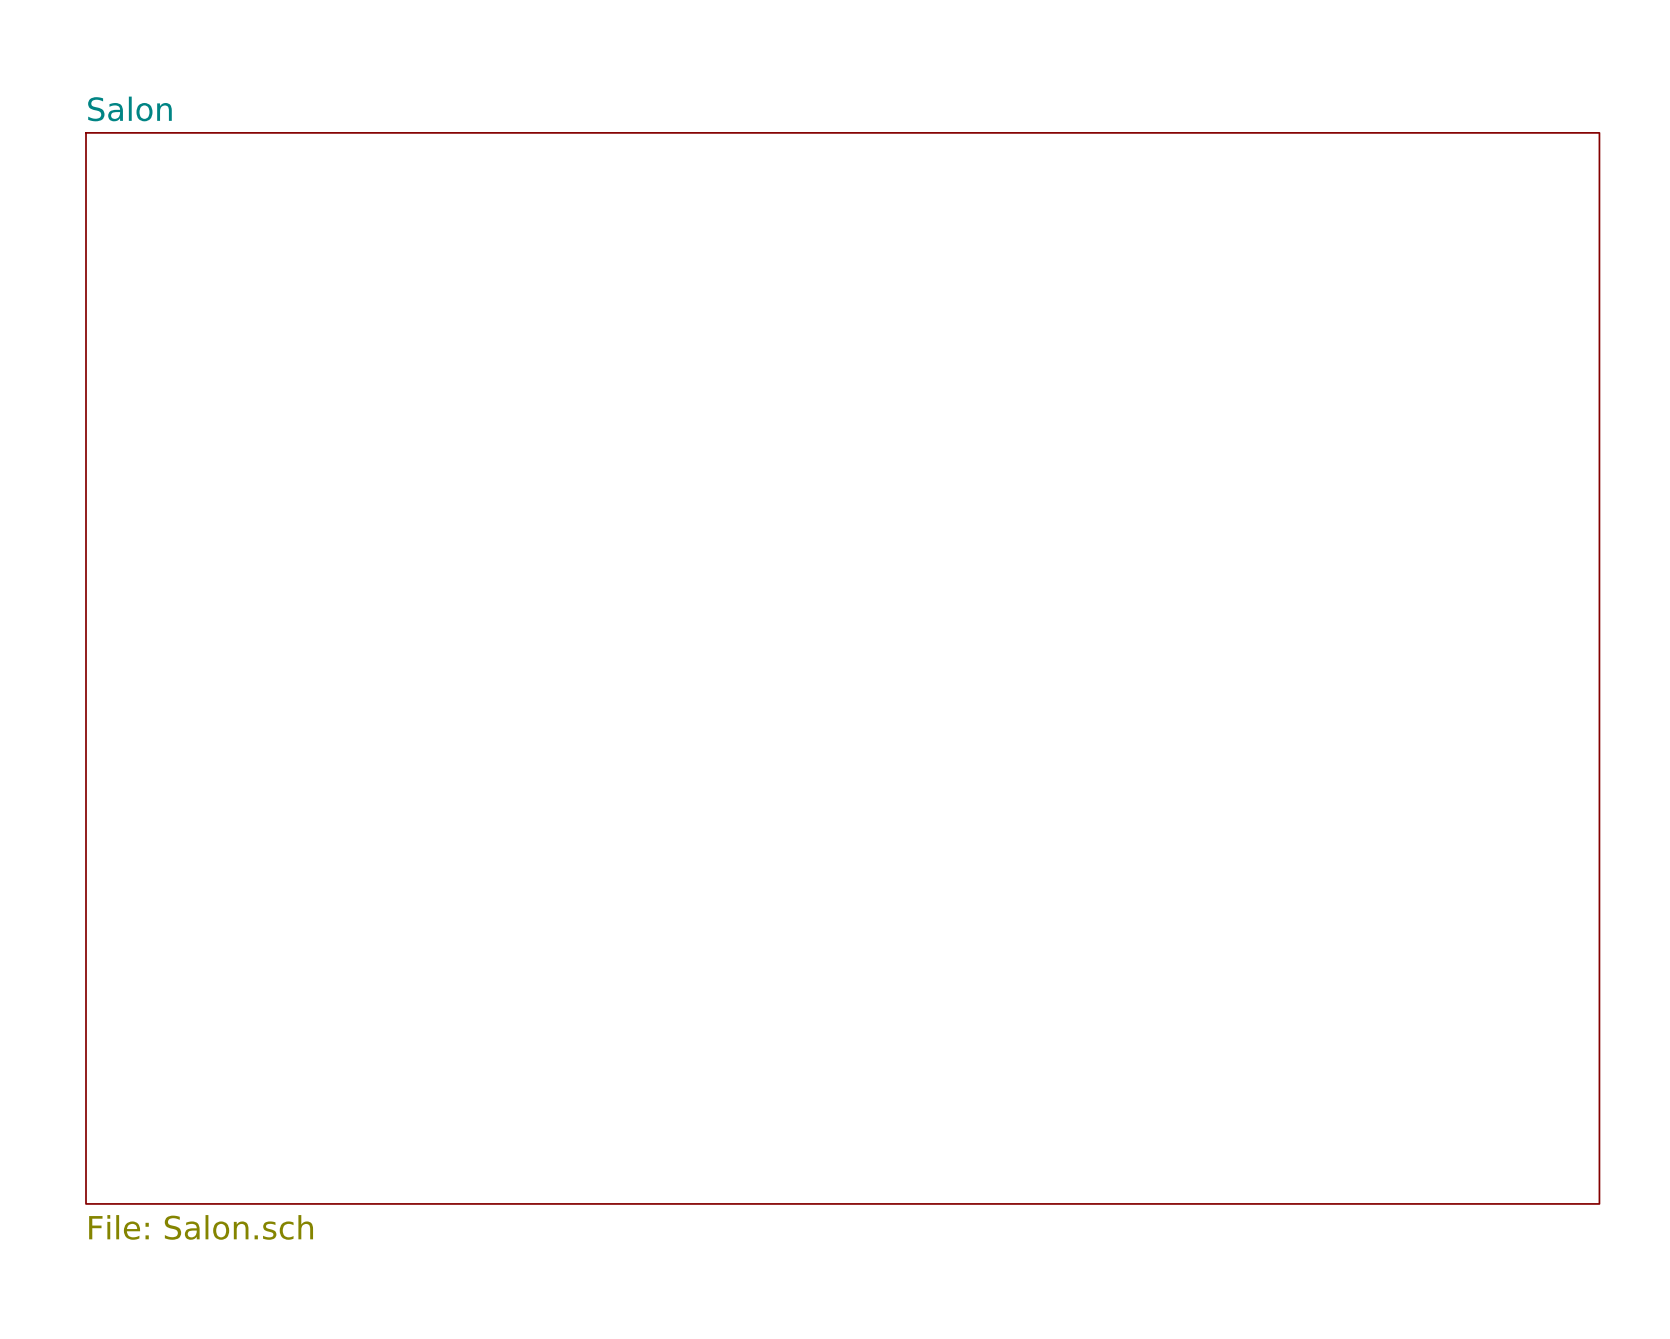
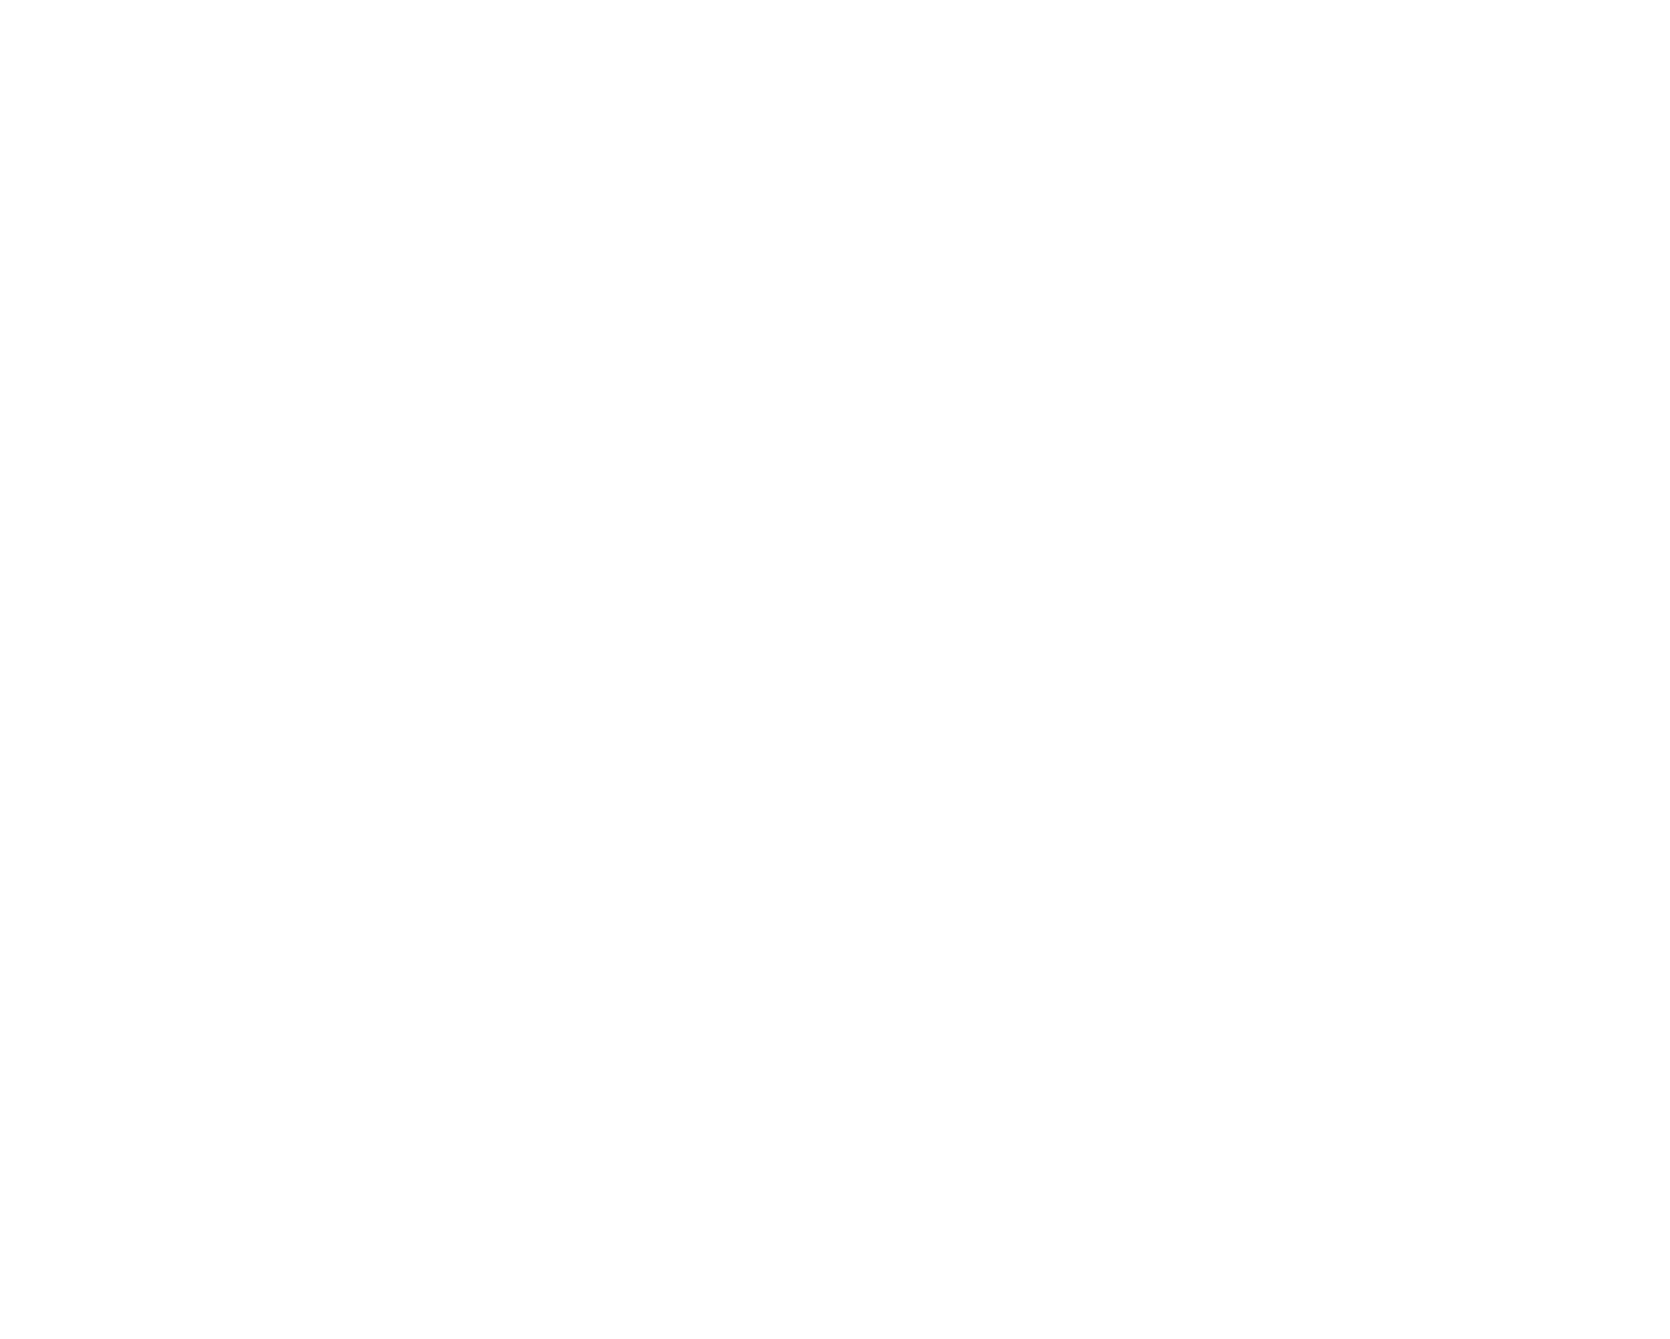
sheet Salon: File: Salon.sch (842, 668) -> none

